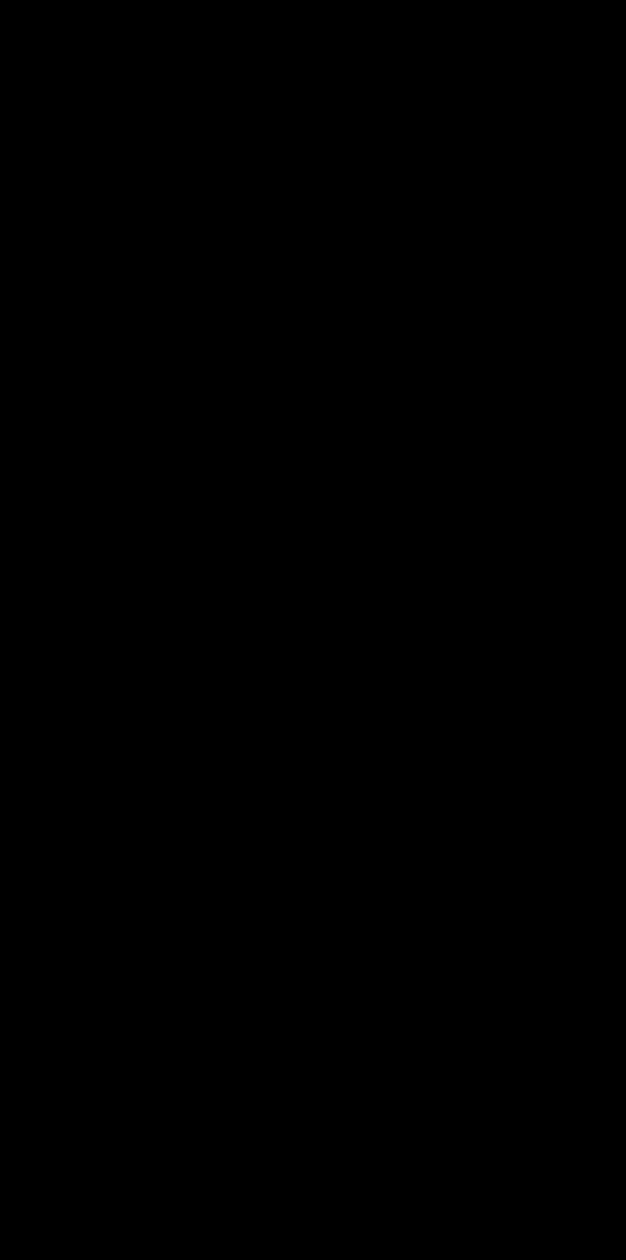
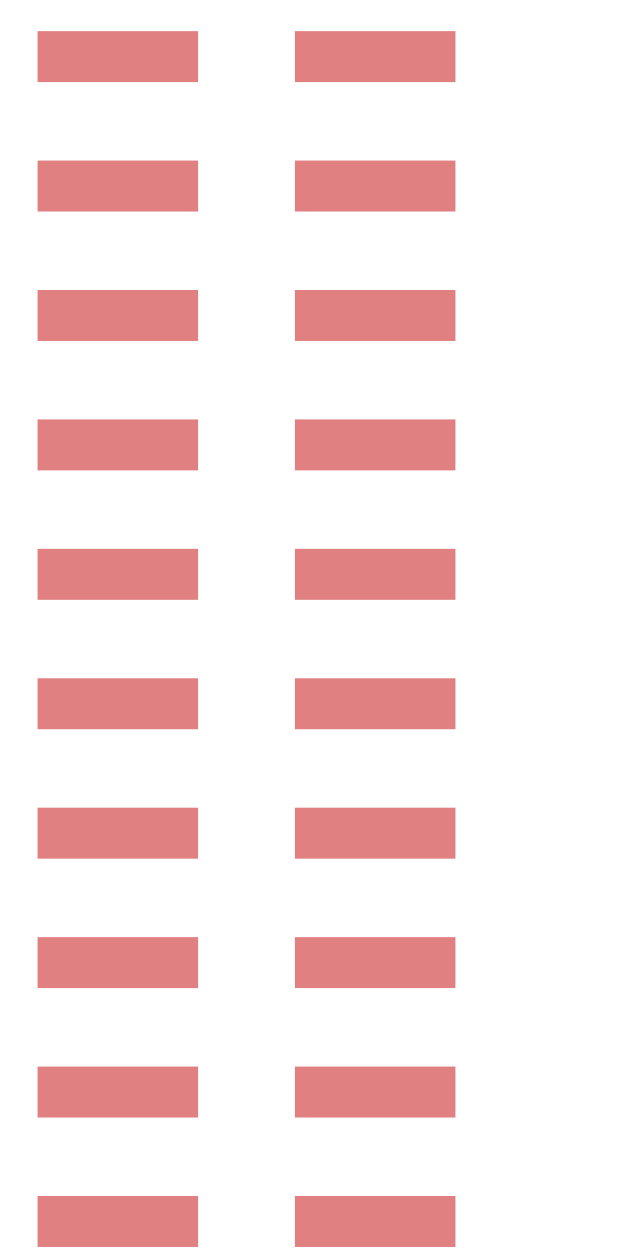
part: none -> (246, 639)

